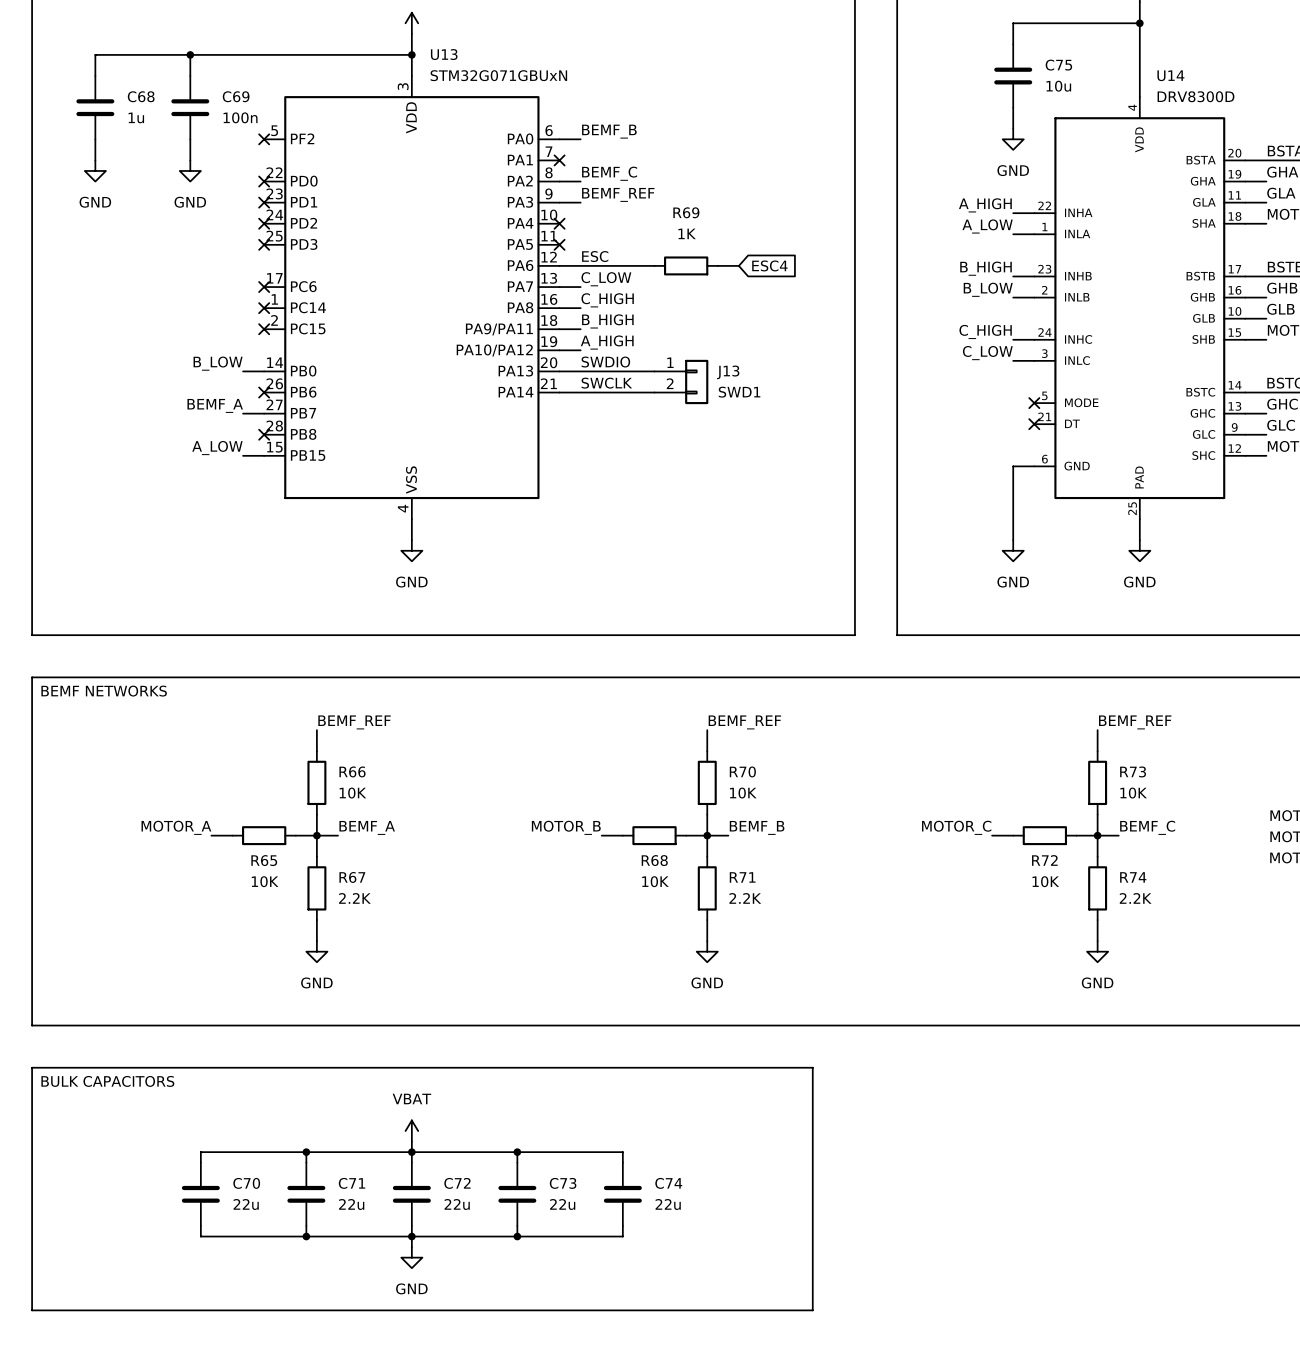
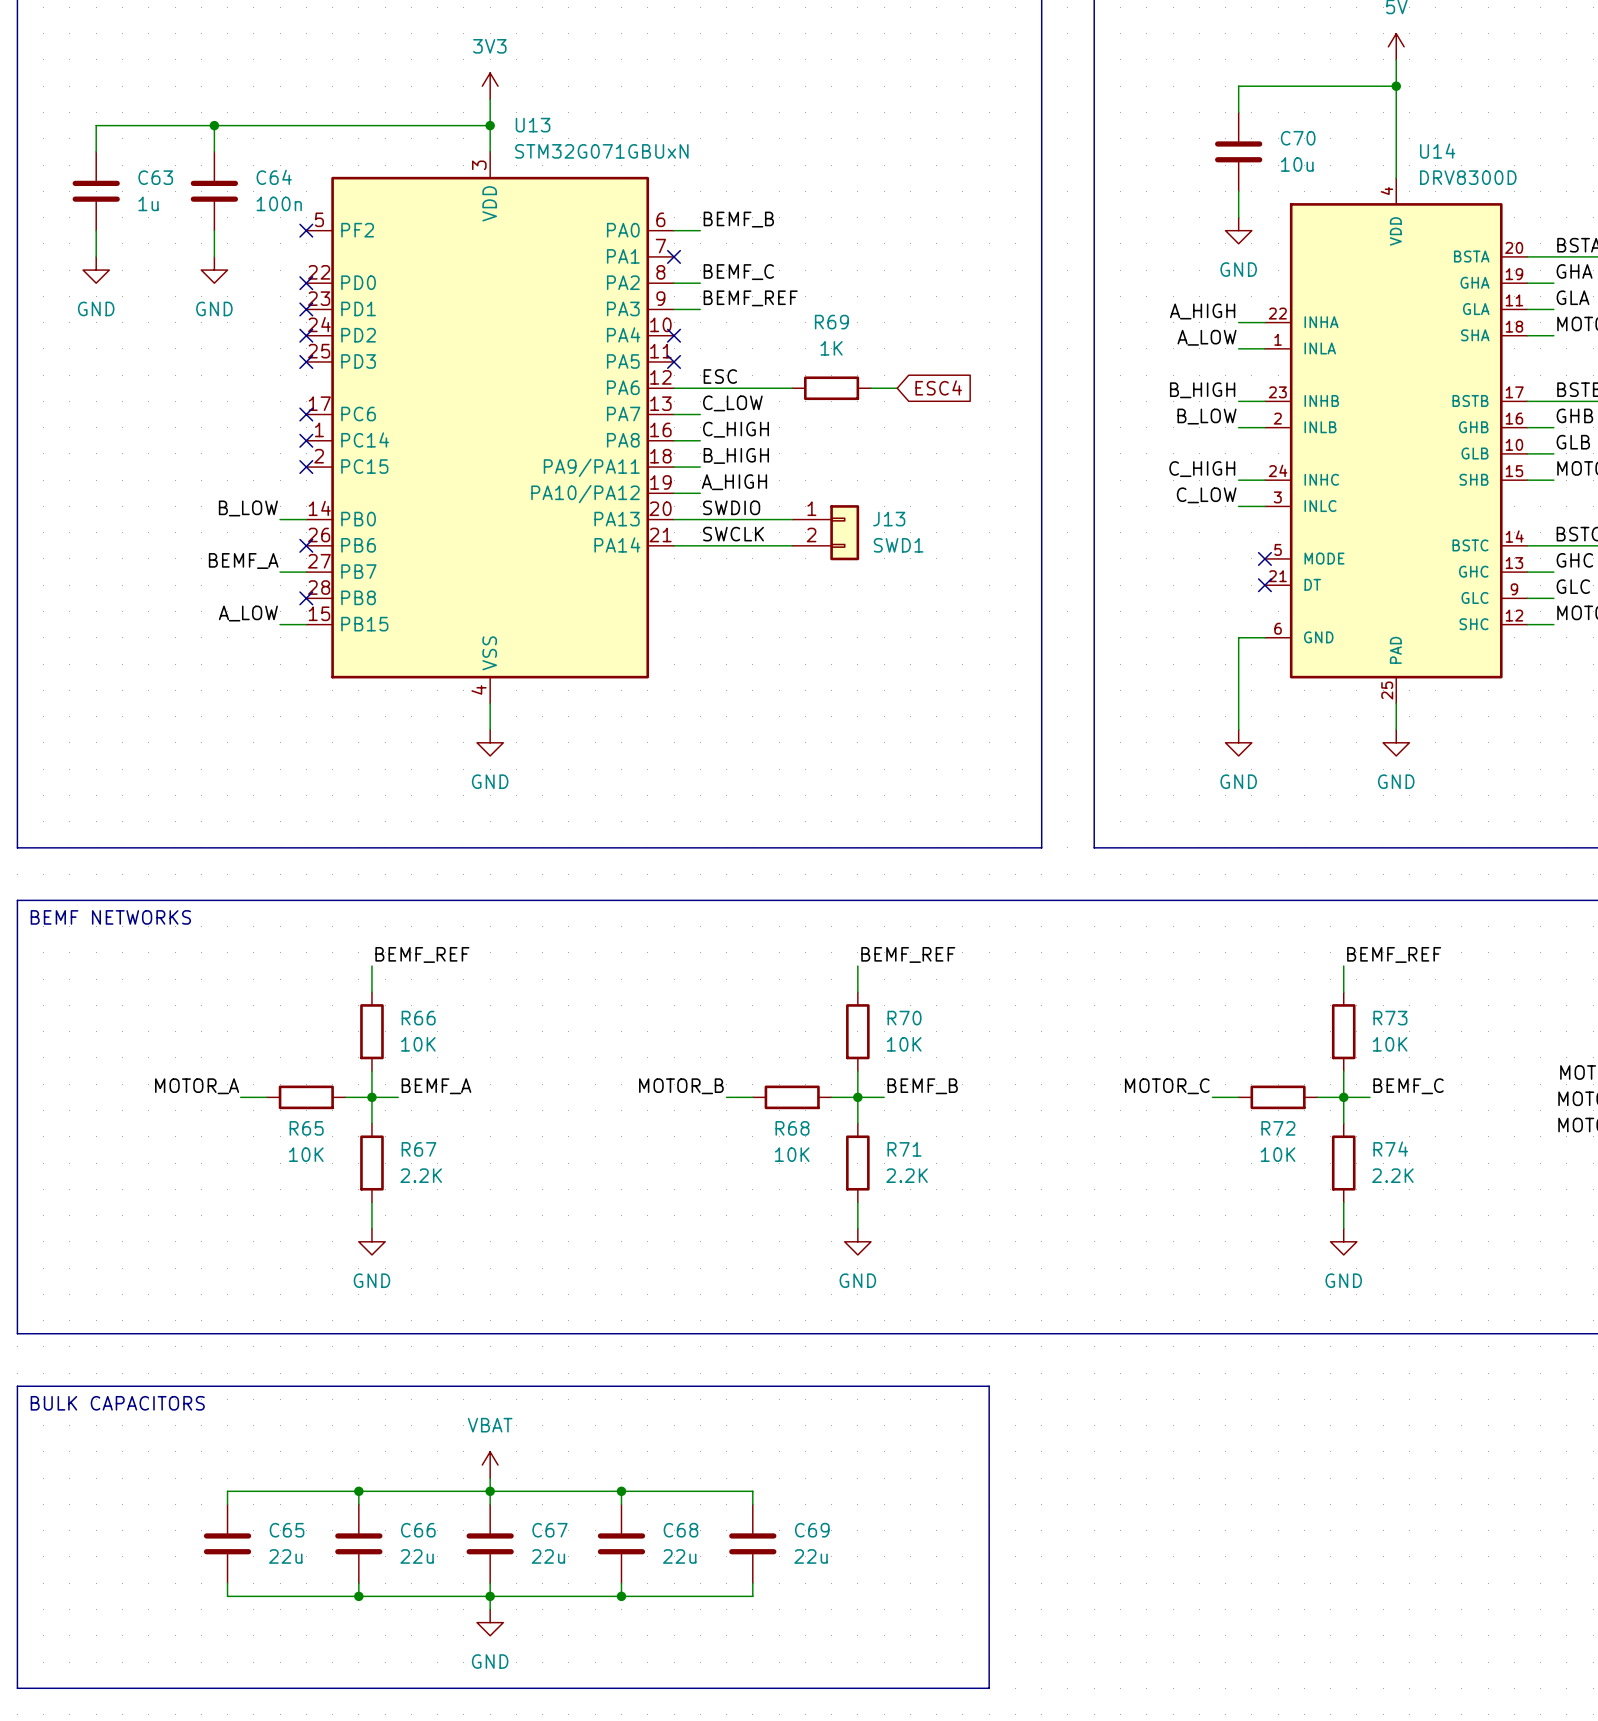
C75 name: C75 (1058, 65) -> C70 (1298, 138)
C68 name: C68 (141, 96) -> C63 (155, 177)
C69 name: C69 (236, 96) -> C64 (274, 177)
C70 name: C70 (246, 1183) -> C65 (287, 1530)
C71 name: C71 (352, 1183) -> C66 (418, 1530)
C72 name: C72 (457, 1183) -> C67 (549, 1530)
C73 name: C73 (563, 1183) -> C68 (680, 1530)
C74 name: C74 (668, 1183) -> C69 (812, 1530)

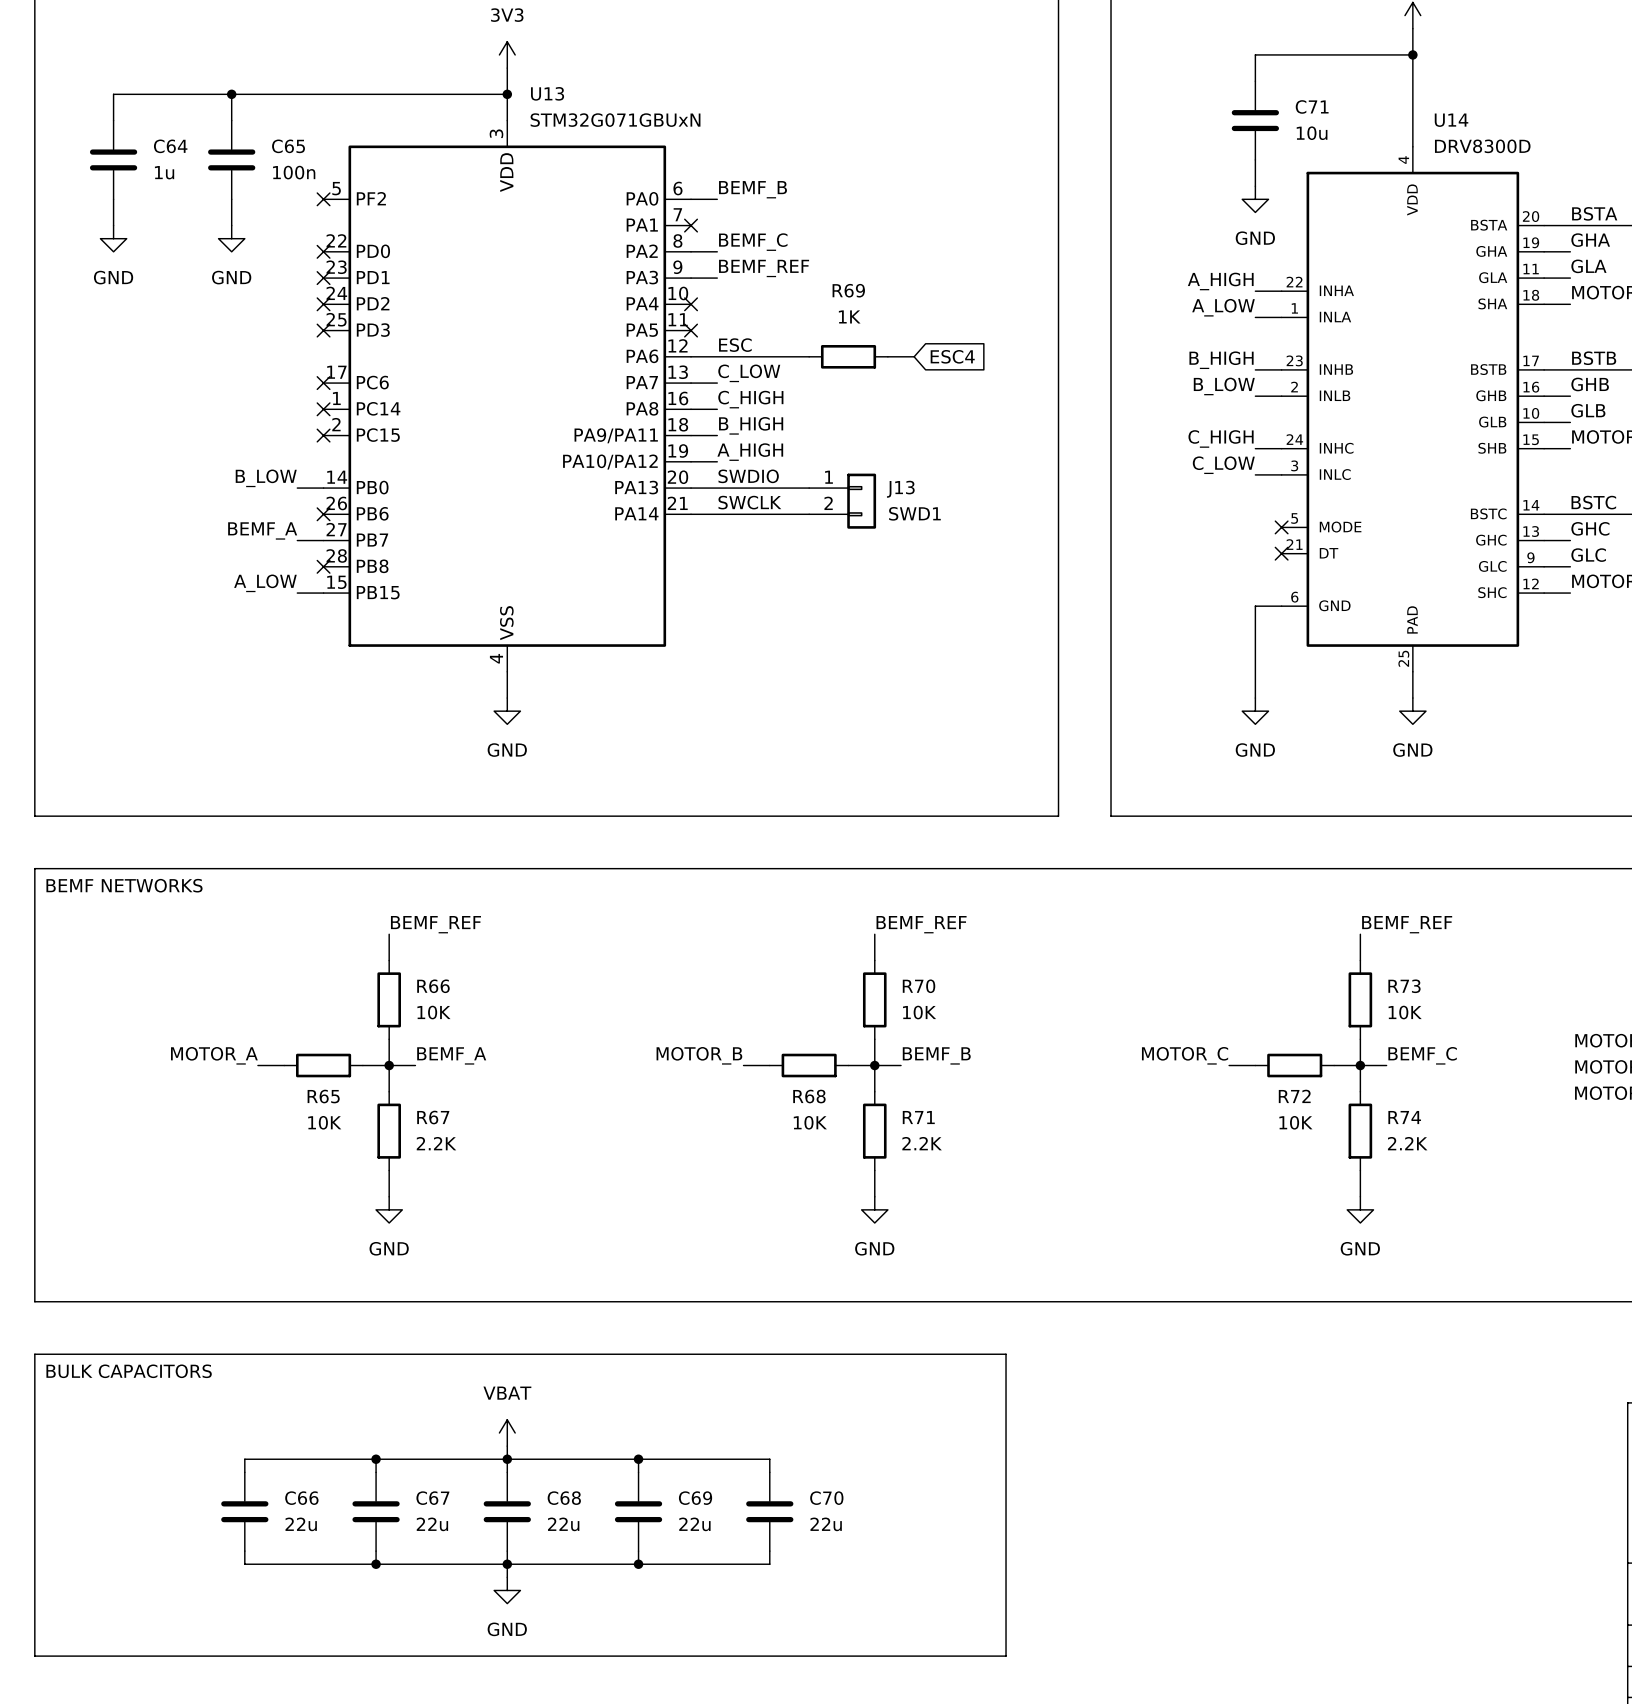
C70 name: C70 (1298, 138) -> C71 (1312, 106)
C63 name: C63 (155, 177) -> C64 (170, 146)
C64 name: C64 (274, 177) -> C65 (288, 146)
C65 name: C65 (287, 1530) -> C66 (301, 1498)
C66 name: C66 (418, 1530) -> C67 (432, 1498)
C67 name: C67 (549, 1530) -> C68 (564, 1498)
C68 name: C68 (680, 1530) -> C69 (695, 1498)
C69 name: C69 (812, 1530) -> C70 (826, 1498)

